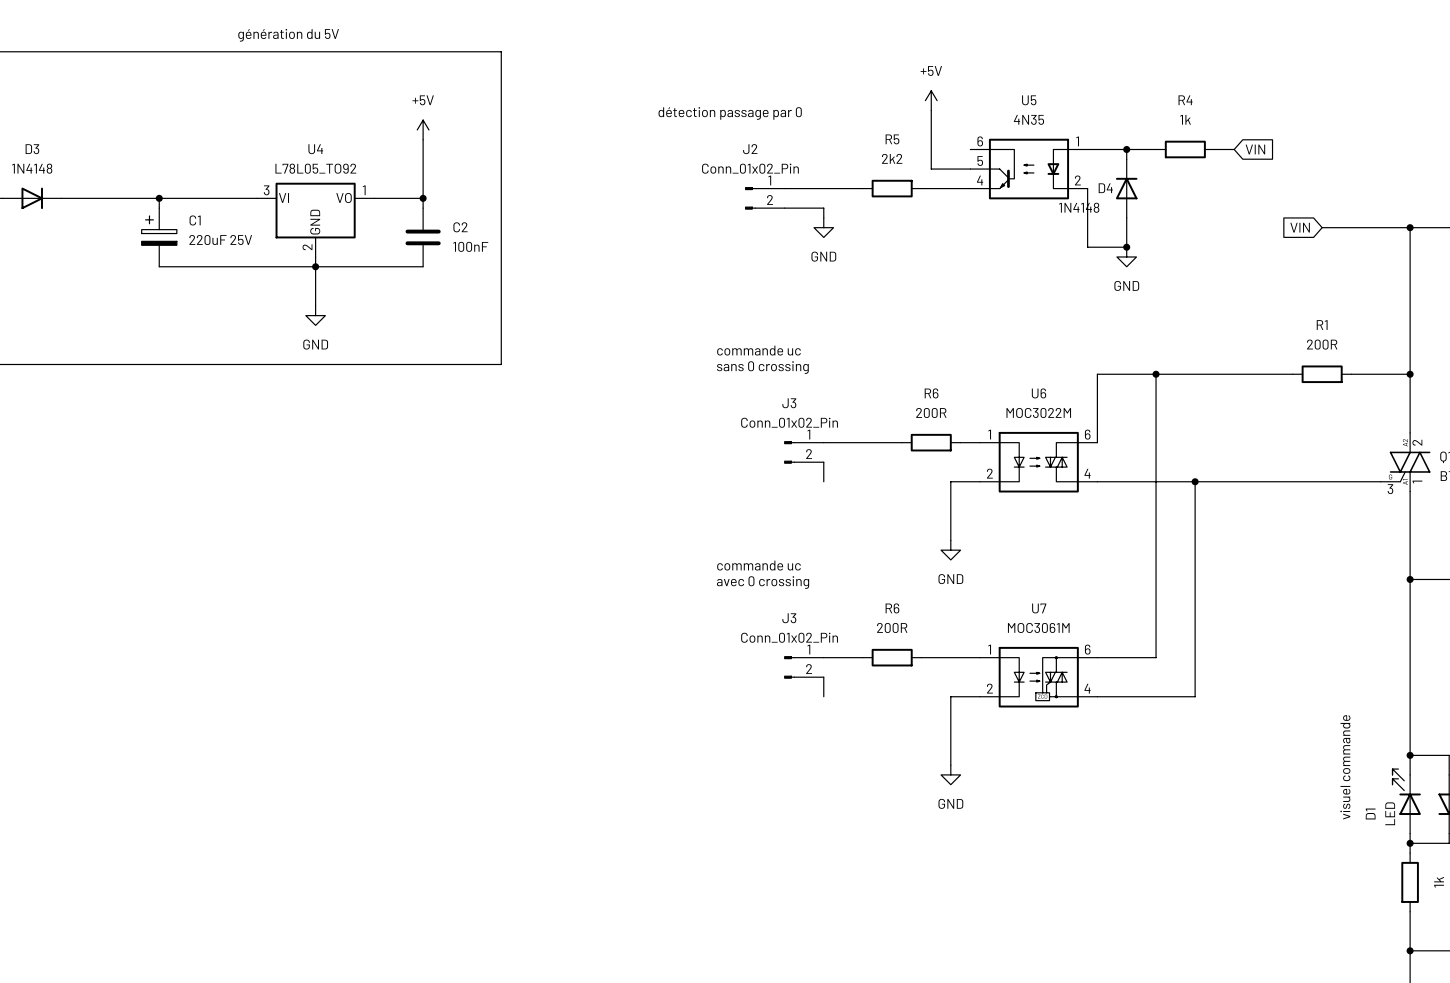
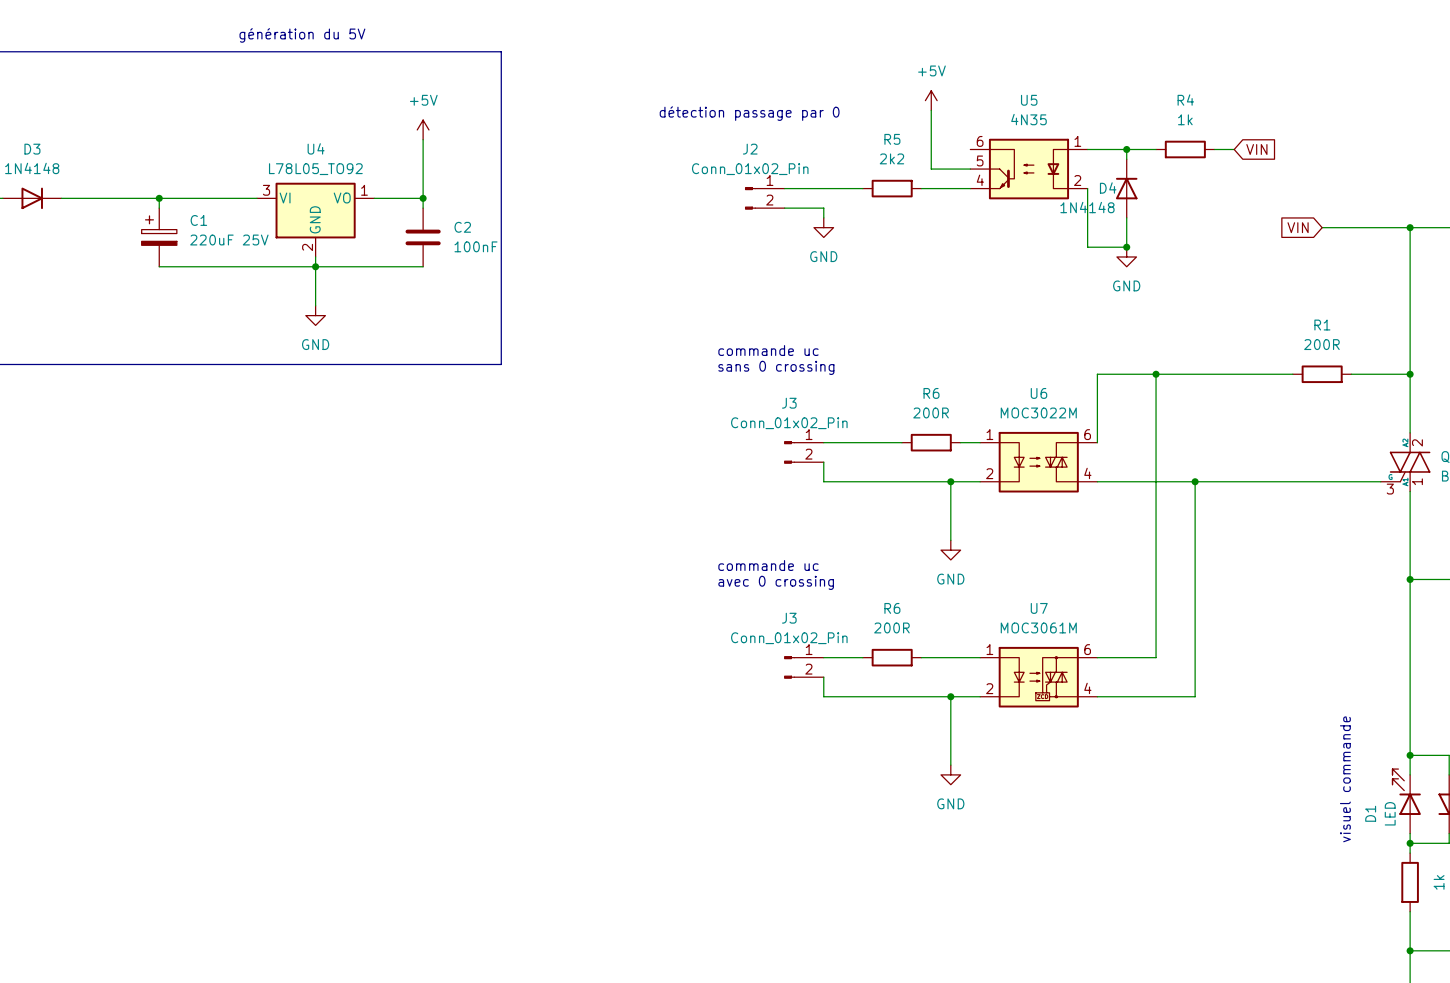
wire: none -> (823, 481) (950, 481)
junction: none -> (950, 481)
wire: none -> (823, 696) (950, 696)
junction: none -> (950, 696)

